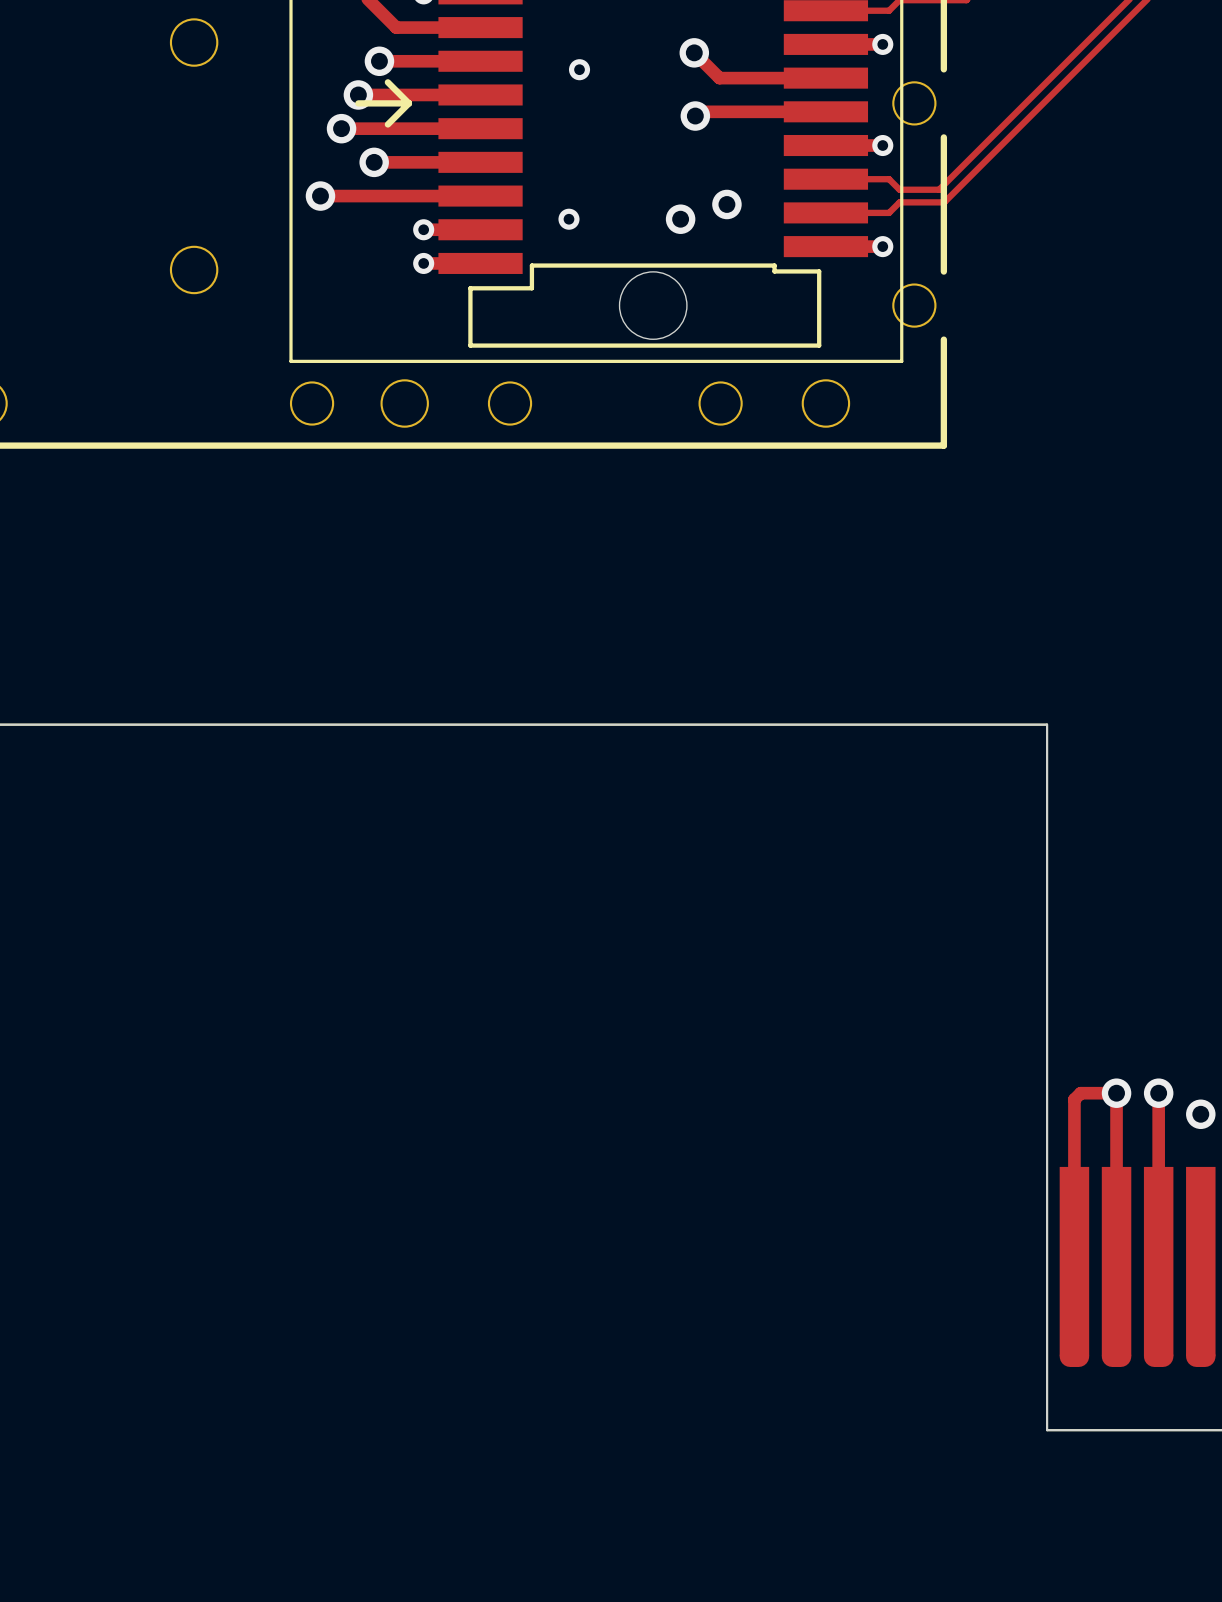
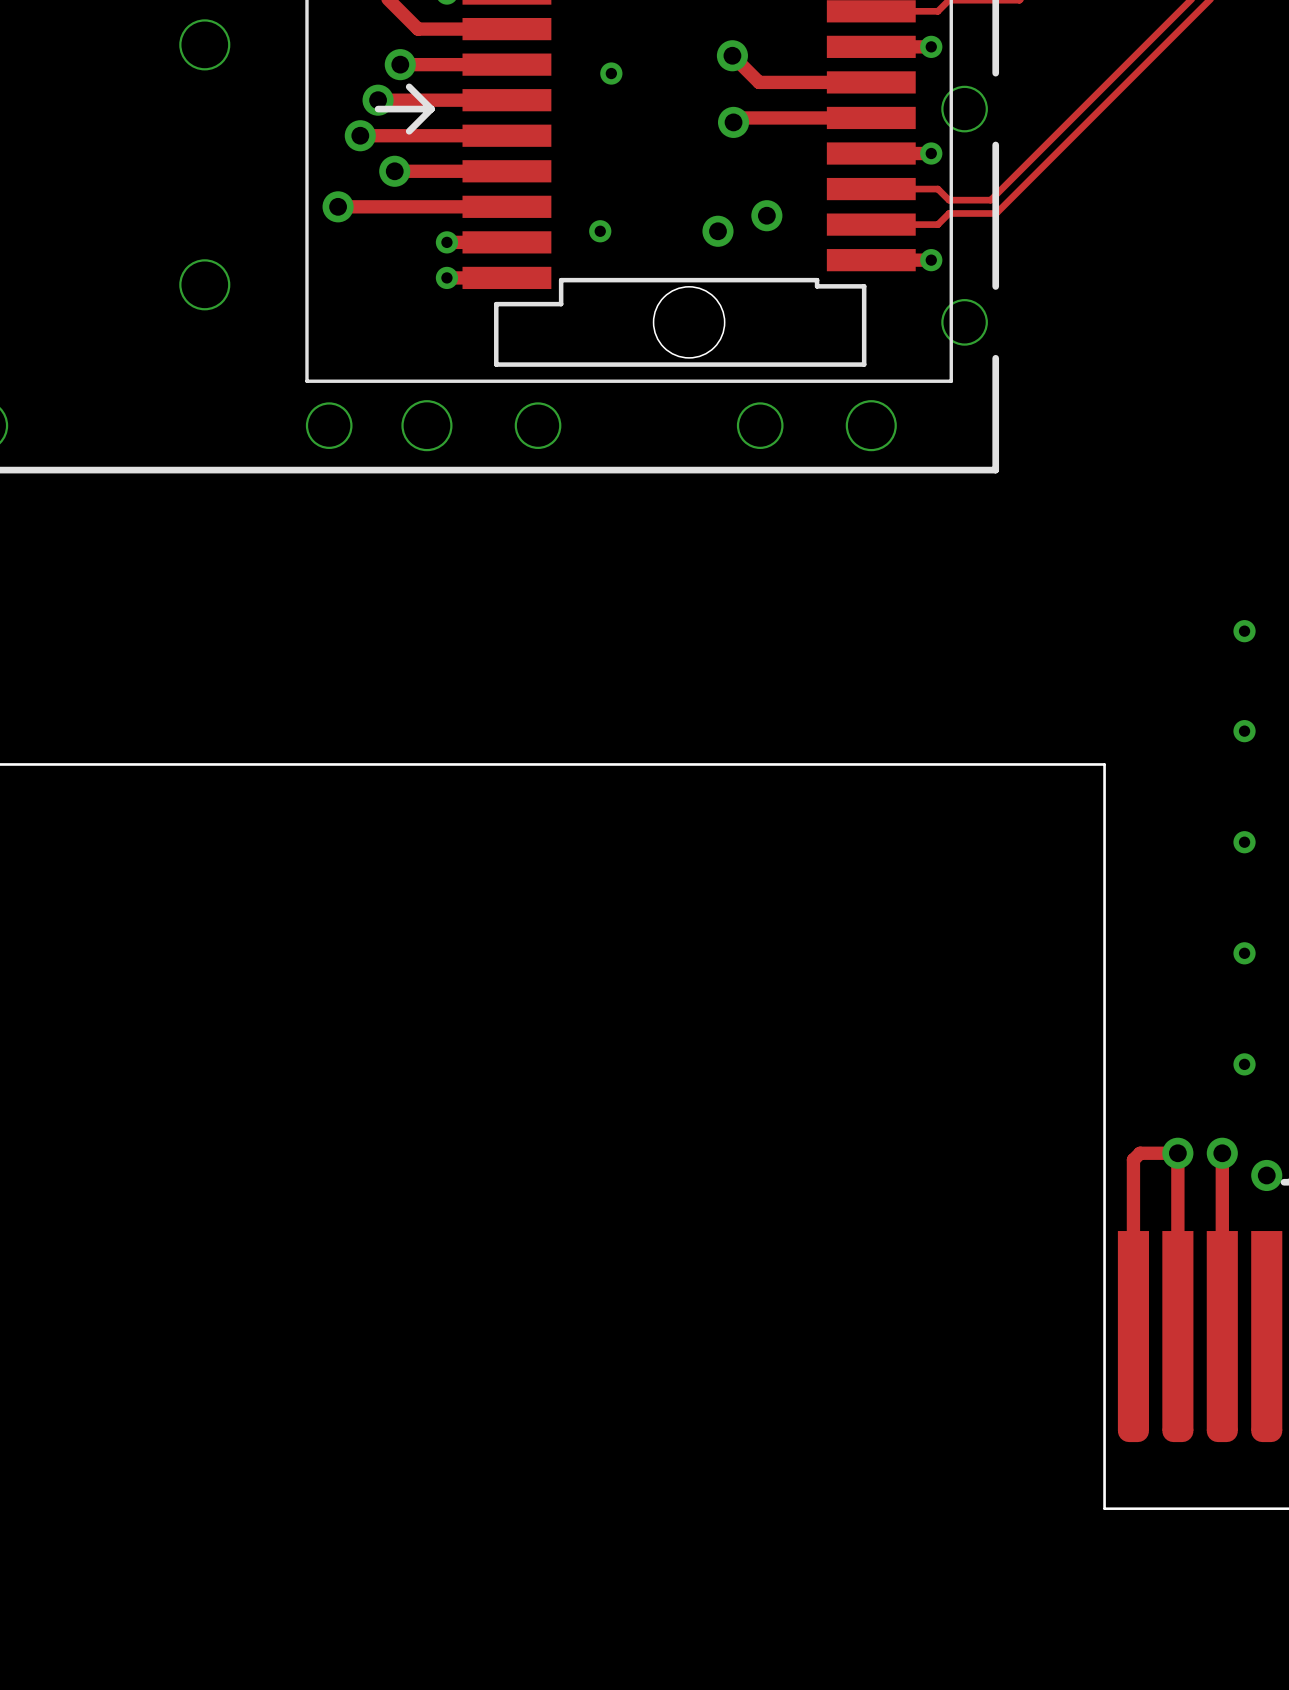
via: none -> (1244, 631)
via: none -> (1244, 731)
via: none -> (1244, 842)
via: none -> (1244, 953)
via: none -> (1244, 1064)

